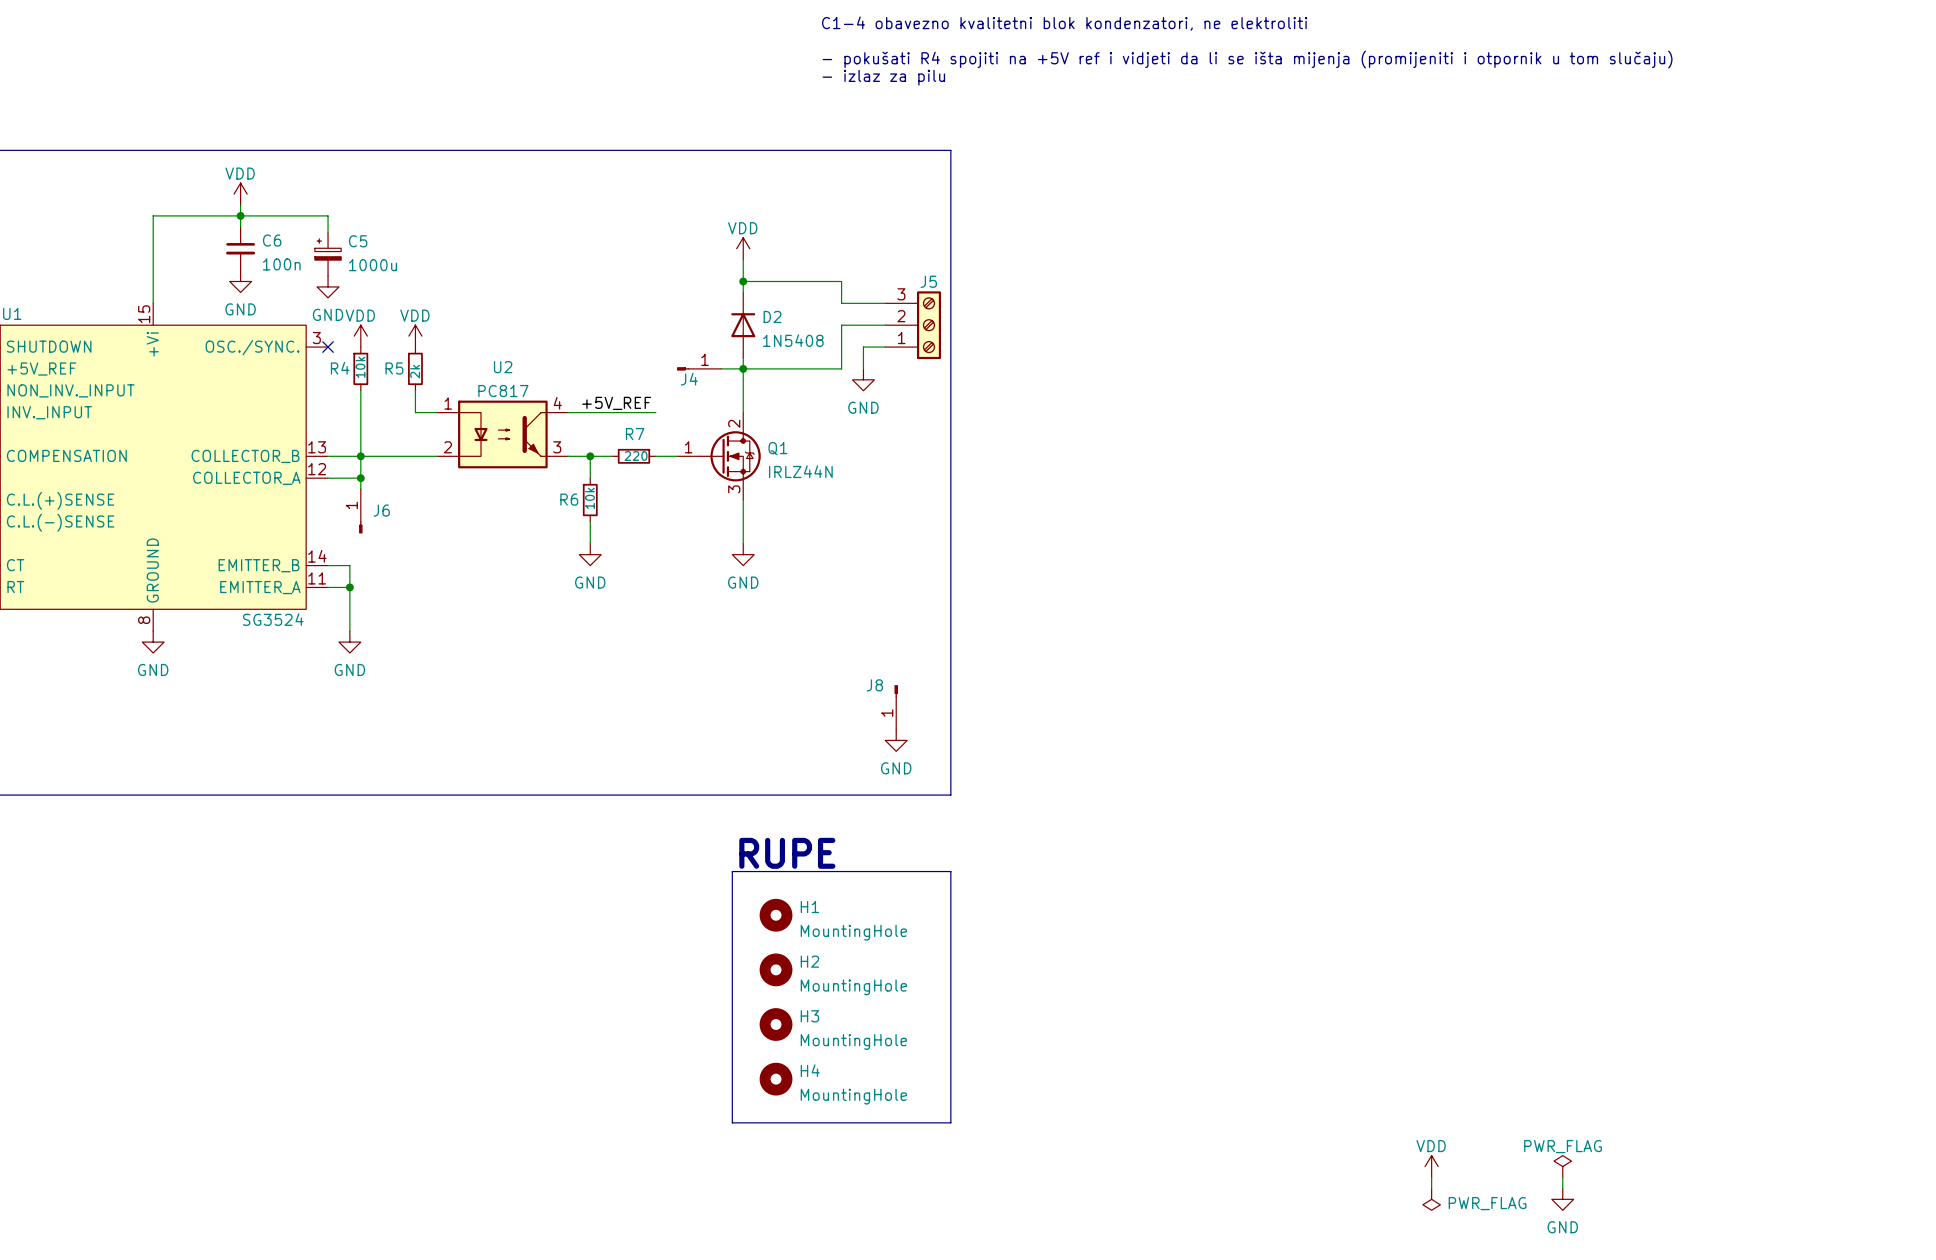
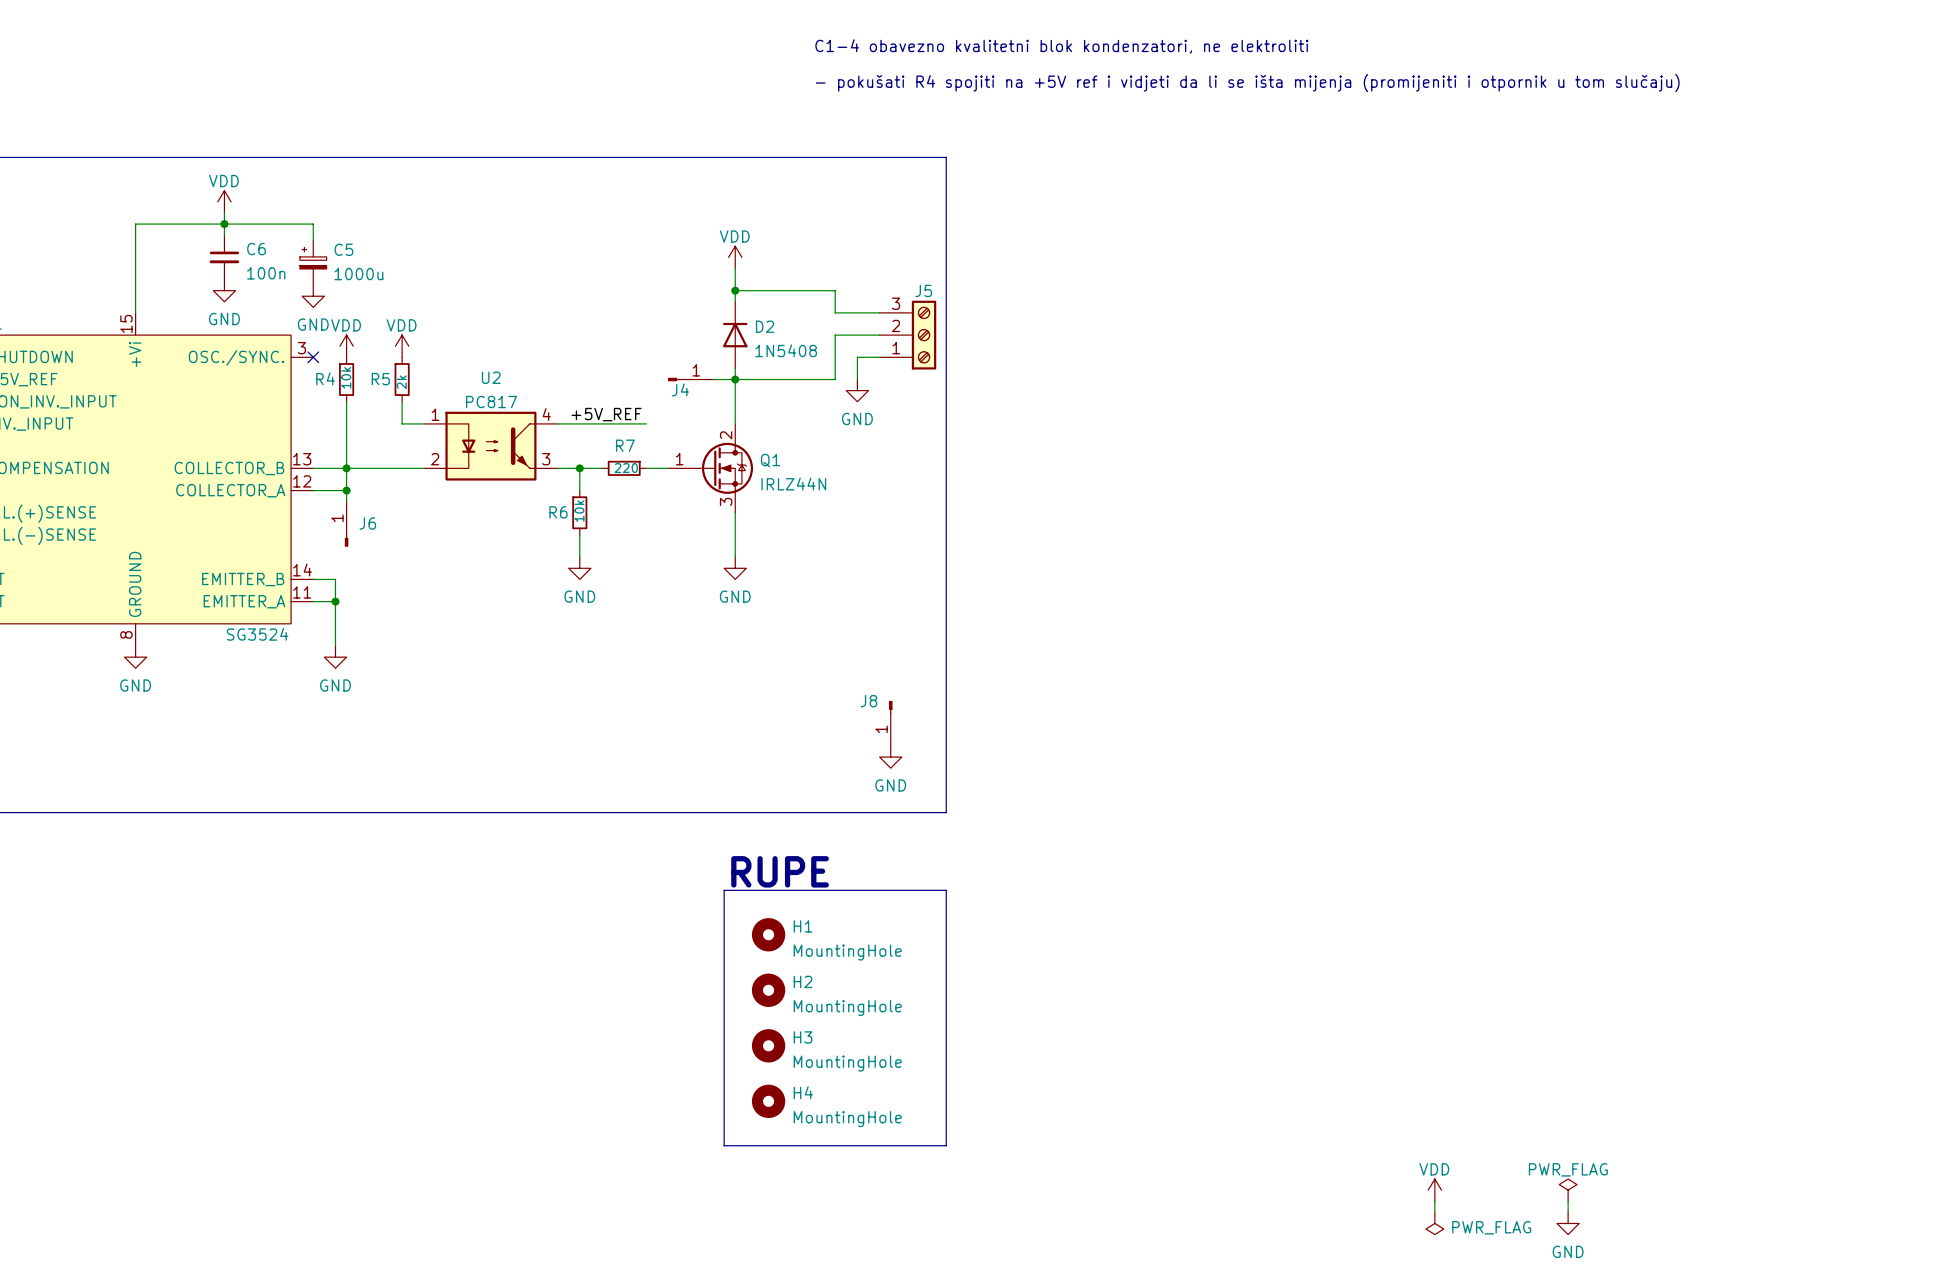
text position: C1-4 obavezno kvalitetni blok kondenzatori, ne elektroliti (1064, 23) -> C1-4 obavezno kvalitetni blok kondenzatori, ne elektroliti (1061, 46)
text: - pokušati R4 spojiti na +5V ref i vidjeti da li se išta mijenja (promijeniti i otpornik u tom slučaju) (1247, 59) -> none
text: - izlaz za pilu (883, 77) -> - pokušati R4 spojiti na +5V ref i vidjeti da li se išta mijenja (promijeniti i otpornik u tom slučaju) (1247, 83)

